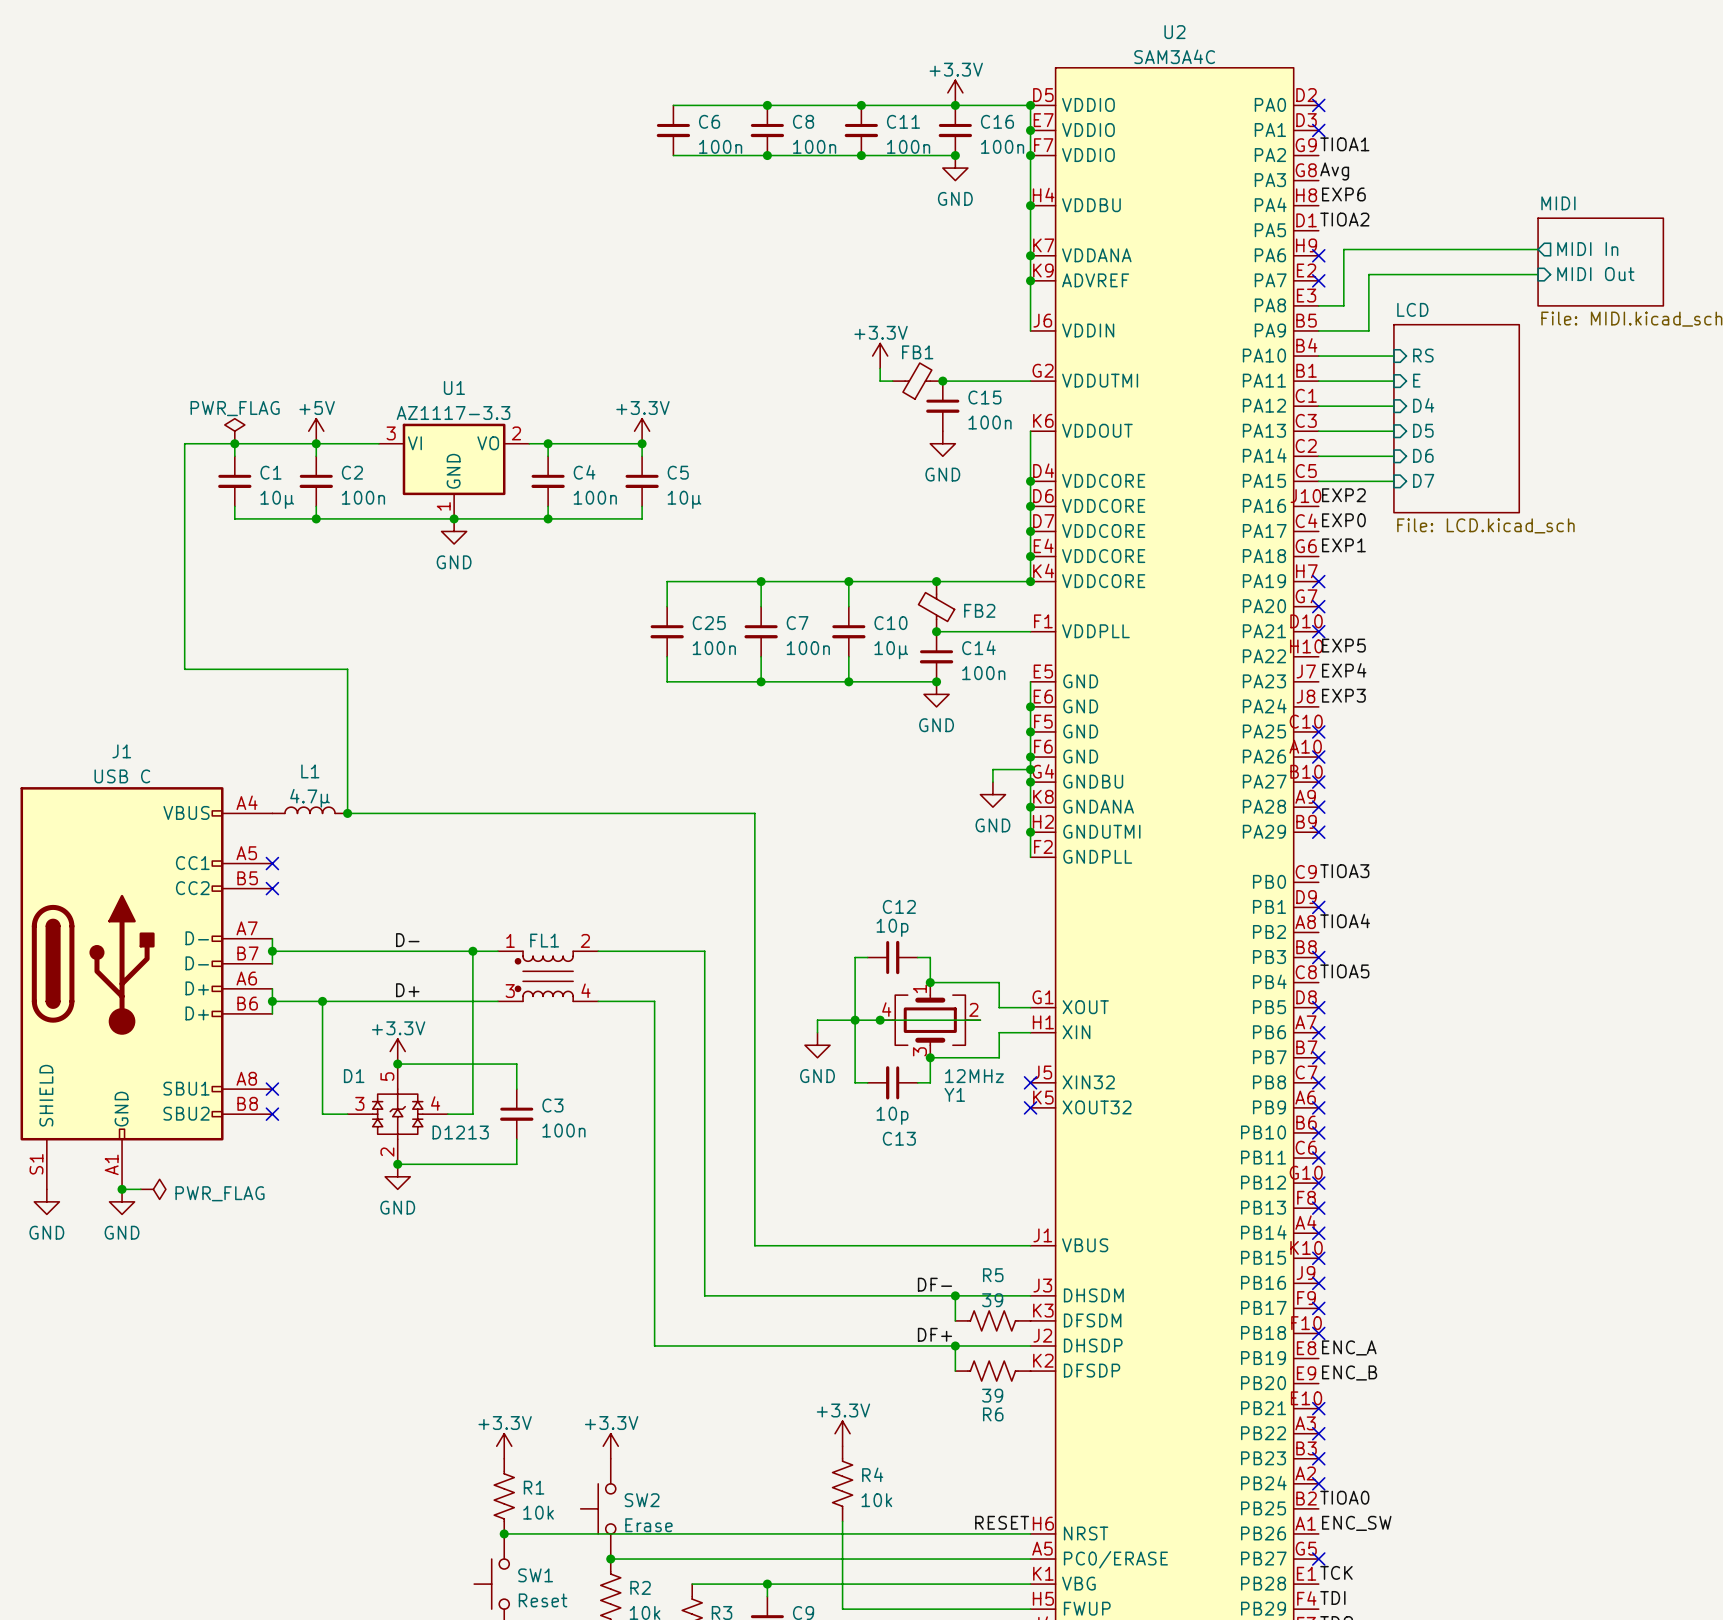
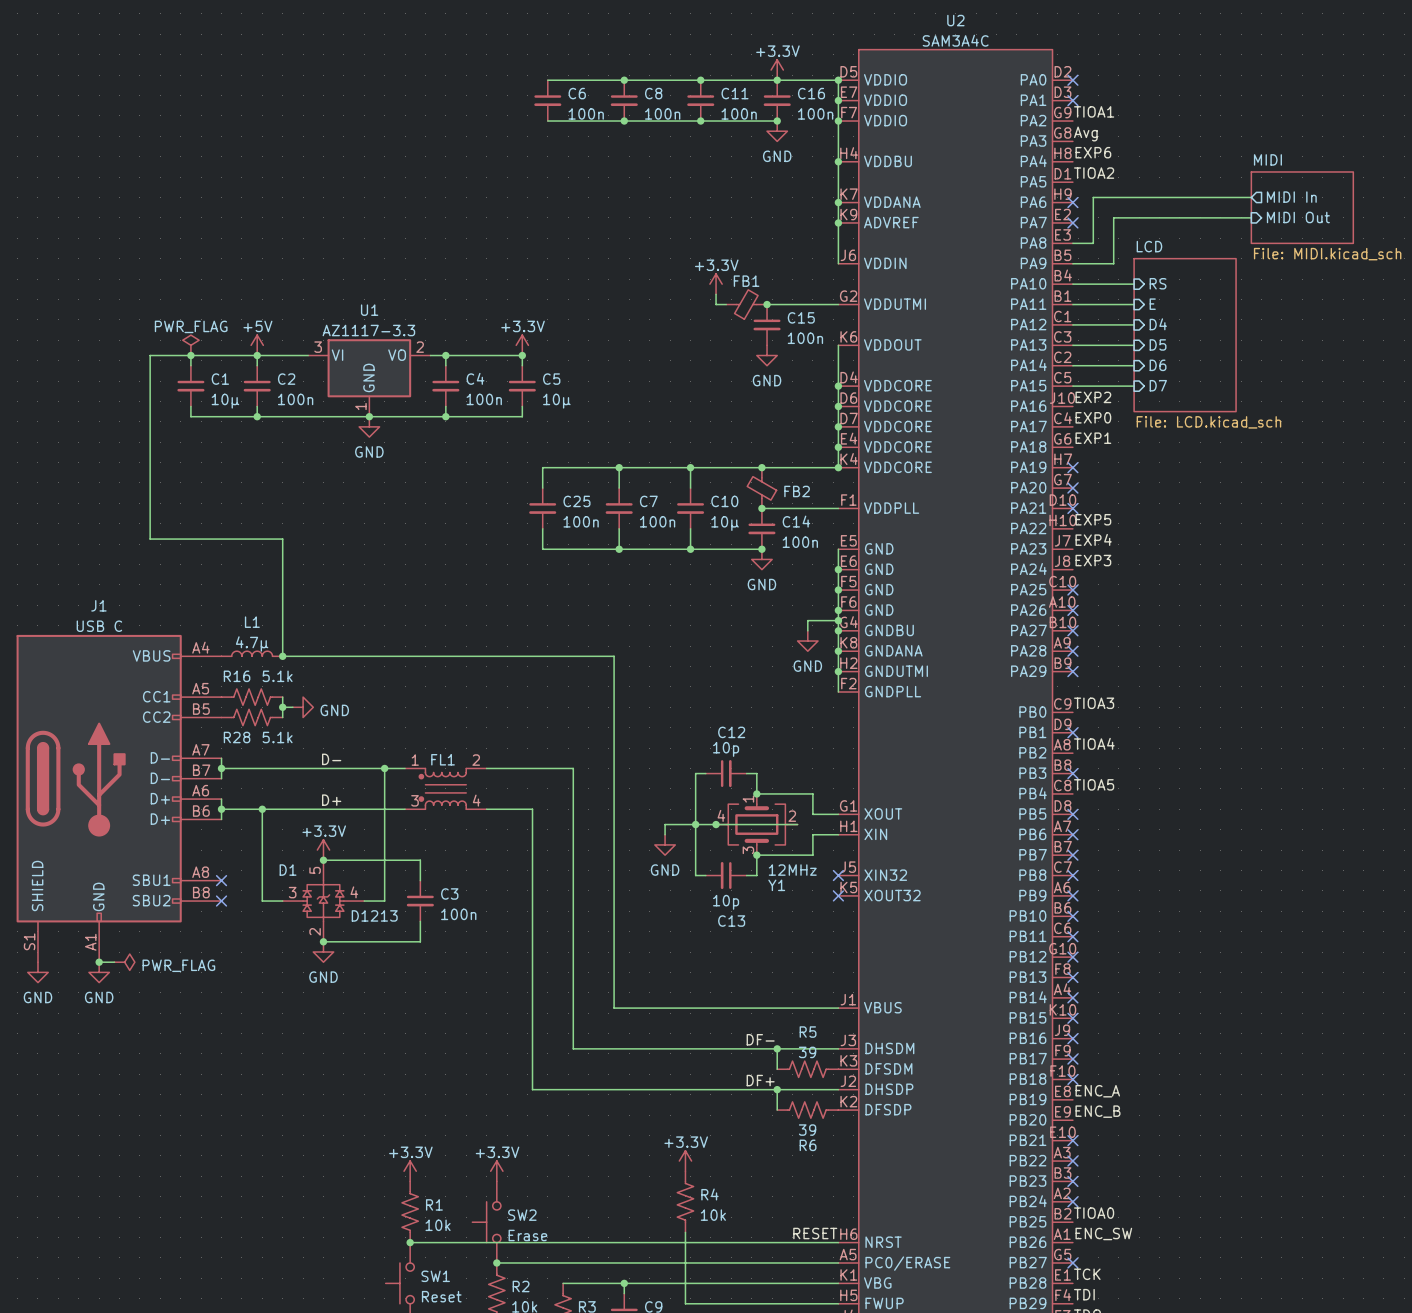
no-connect mark: (272, 863) -> none
R16: none -> 5.1k (252, 697)
wire: none -> (282, 697) (282, 717)
wire: none -> (282, 707) (292, 707)
junction: none -> (282, 707)
power symbol: none -> GND (303, 707)
no-connect mark: (272, 888) -> none
R28: none -> 5.1k (252, 717)

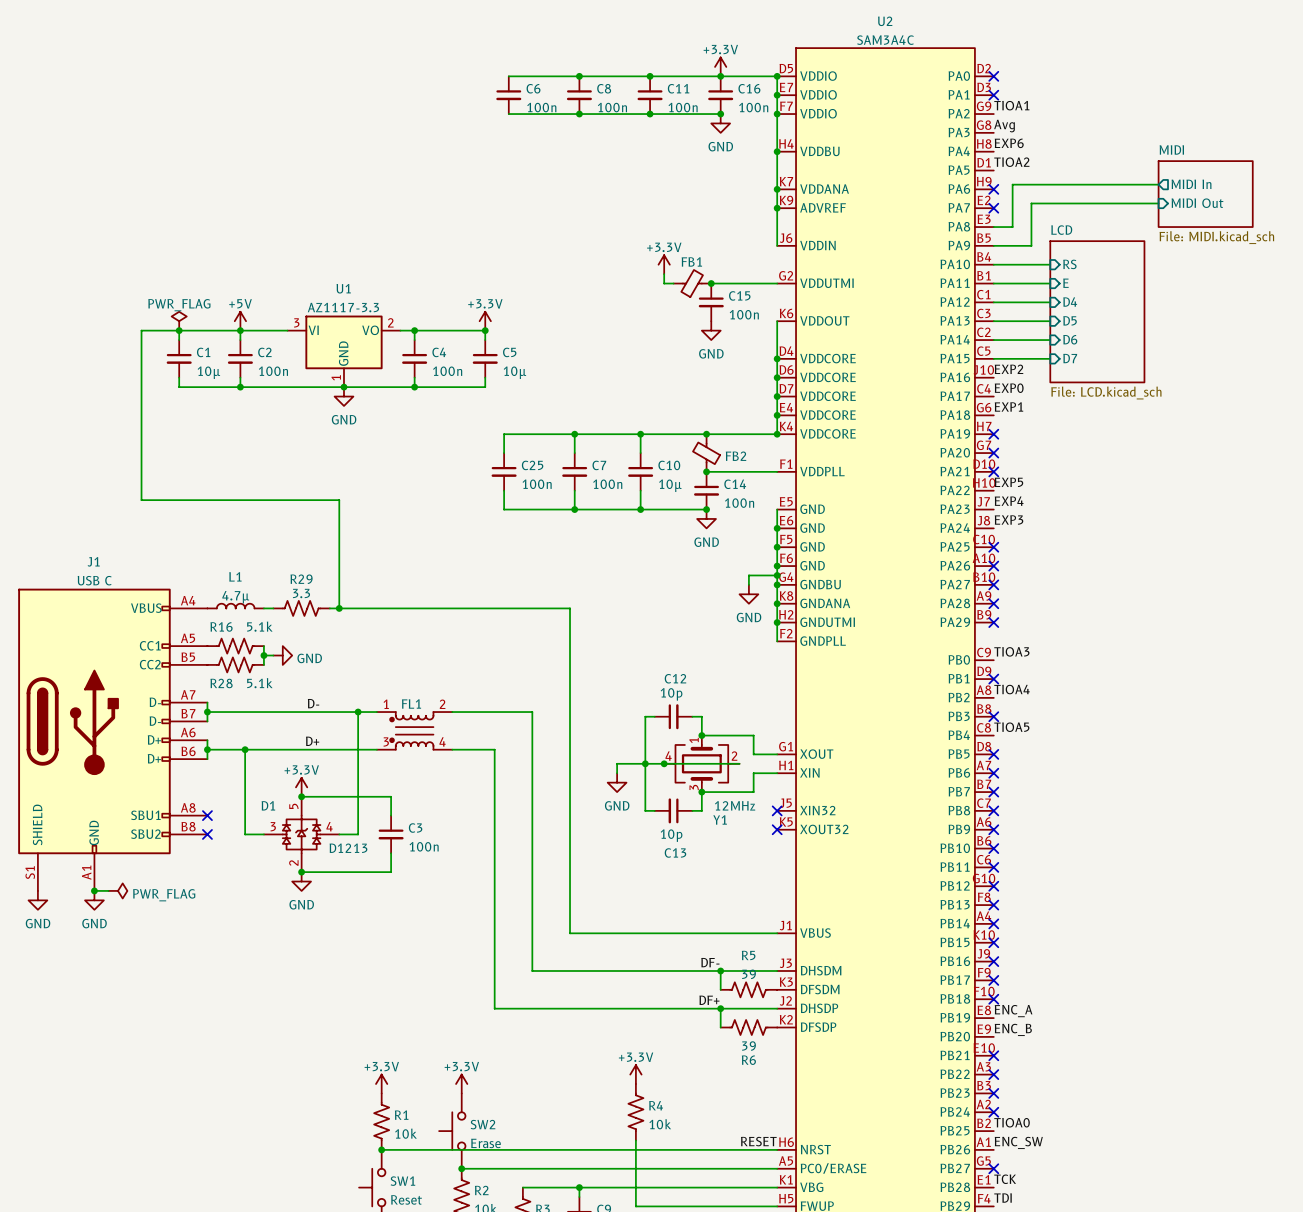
wire: (282, 539) (282, 656) -> (263, 500) (339, 500) (339, 608)
junction: (282, 656) -> none
R29: none -> 3.3 (301, 608)
junction: none -> (339, 608)

